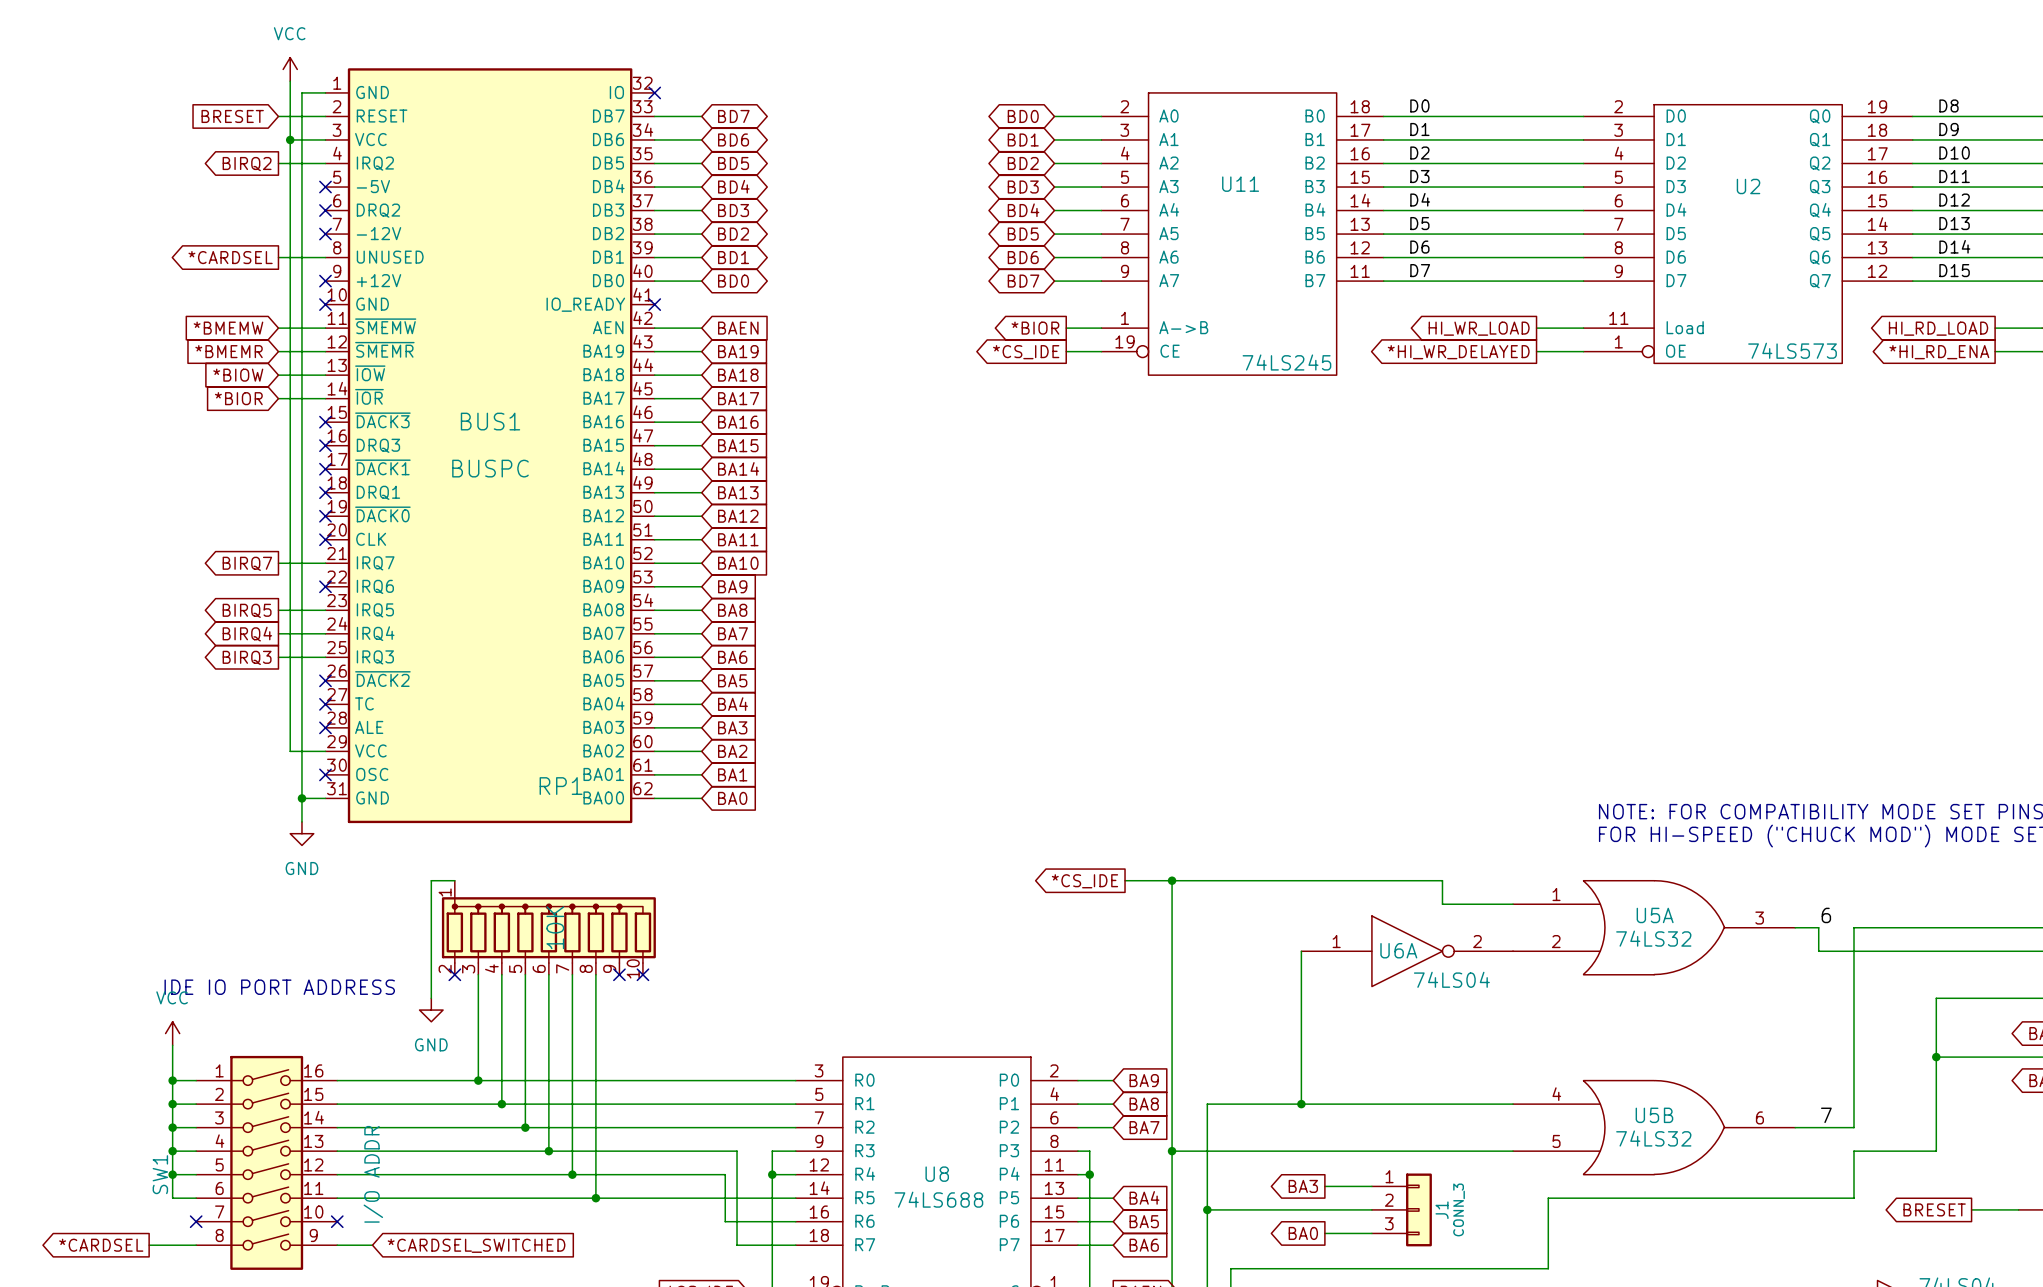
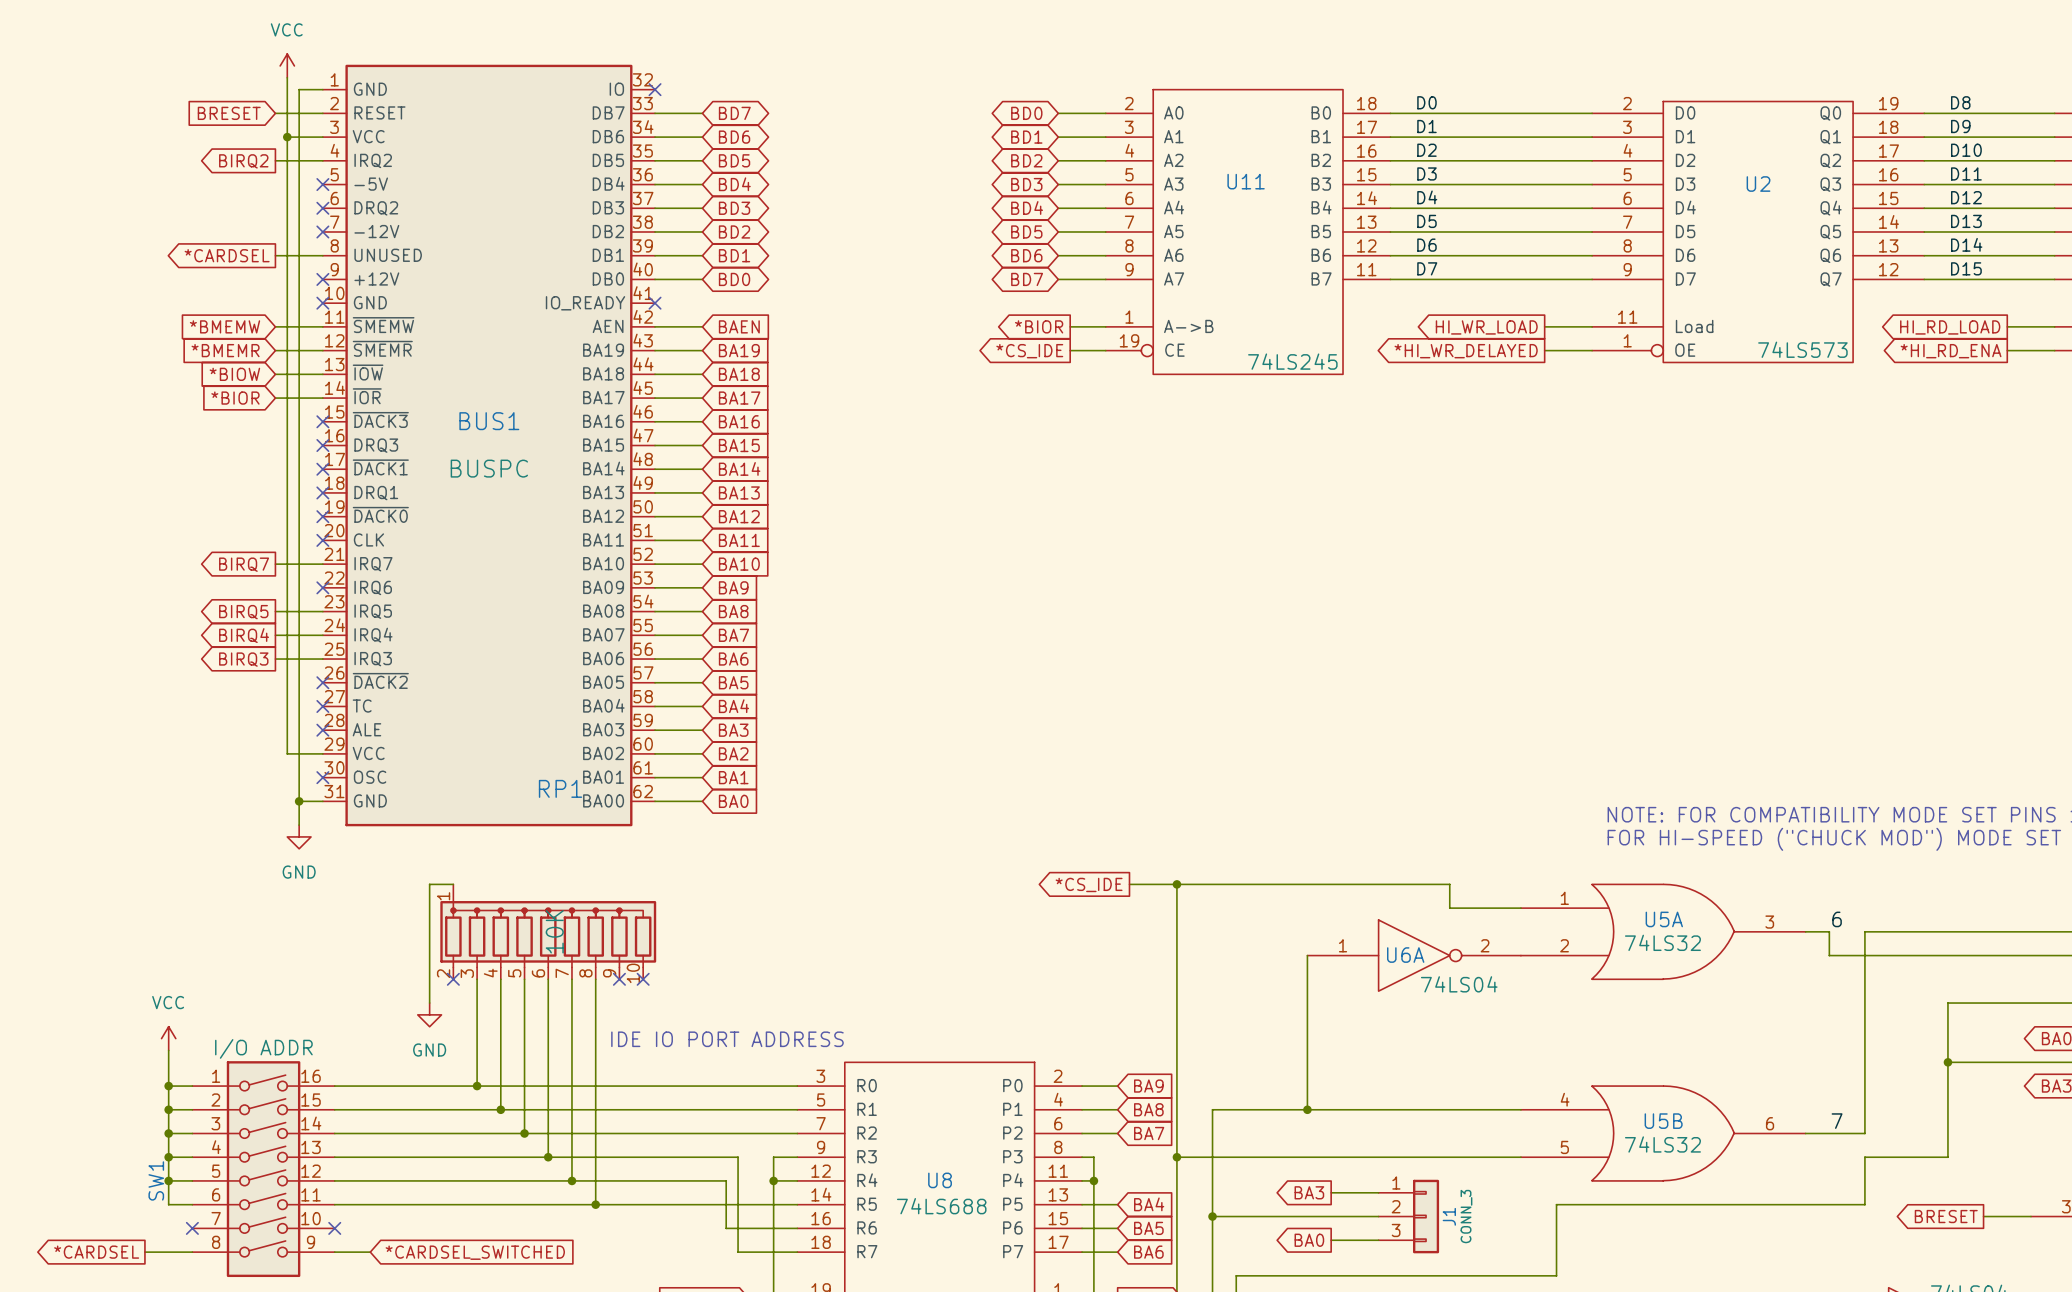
text: IDE IO PORT ADDRESS (279, 987) -> none
text: none -> IDE IO PORT ADDRESS (727, 1039)
SW1 value rotation: 0° (373, 1174) -> 90° clockwise (263, 1048)
SW1 value position: I/O ADDR (373, 1174) -> I/O ADDR (263, 1048)

